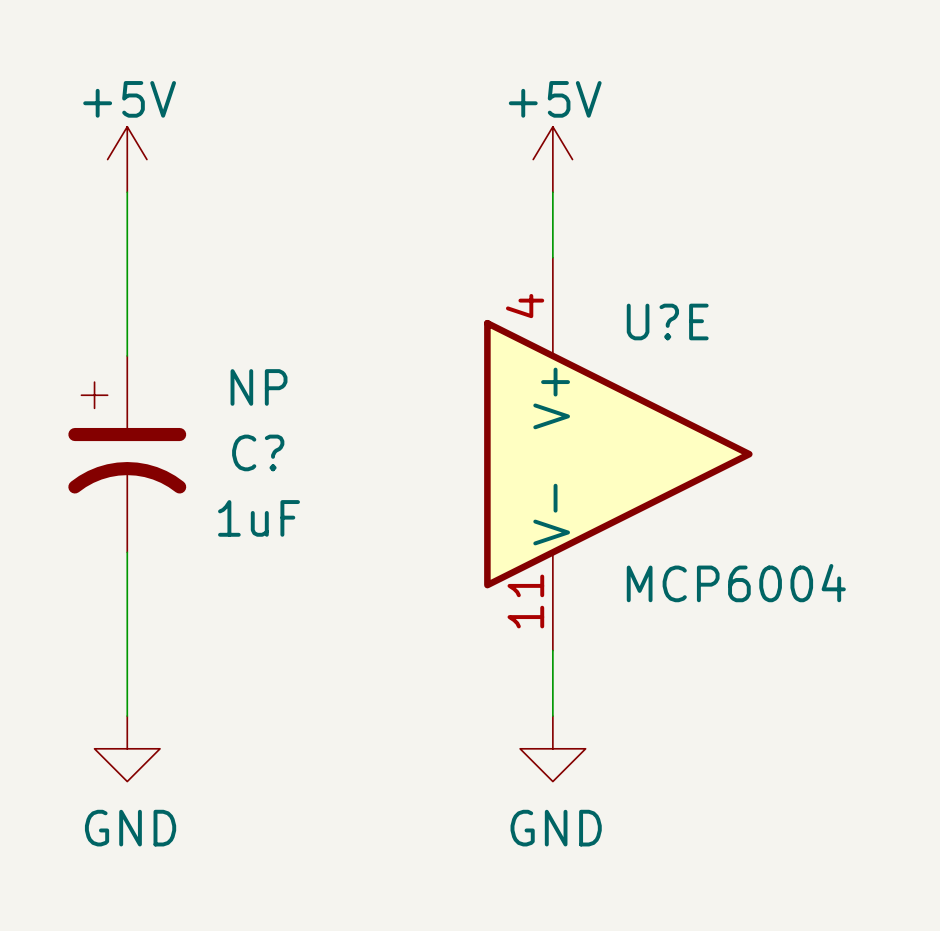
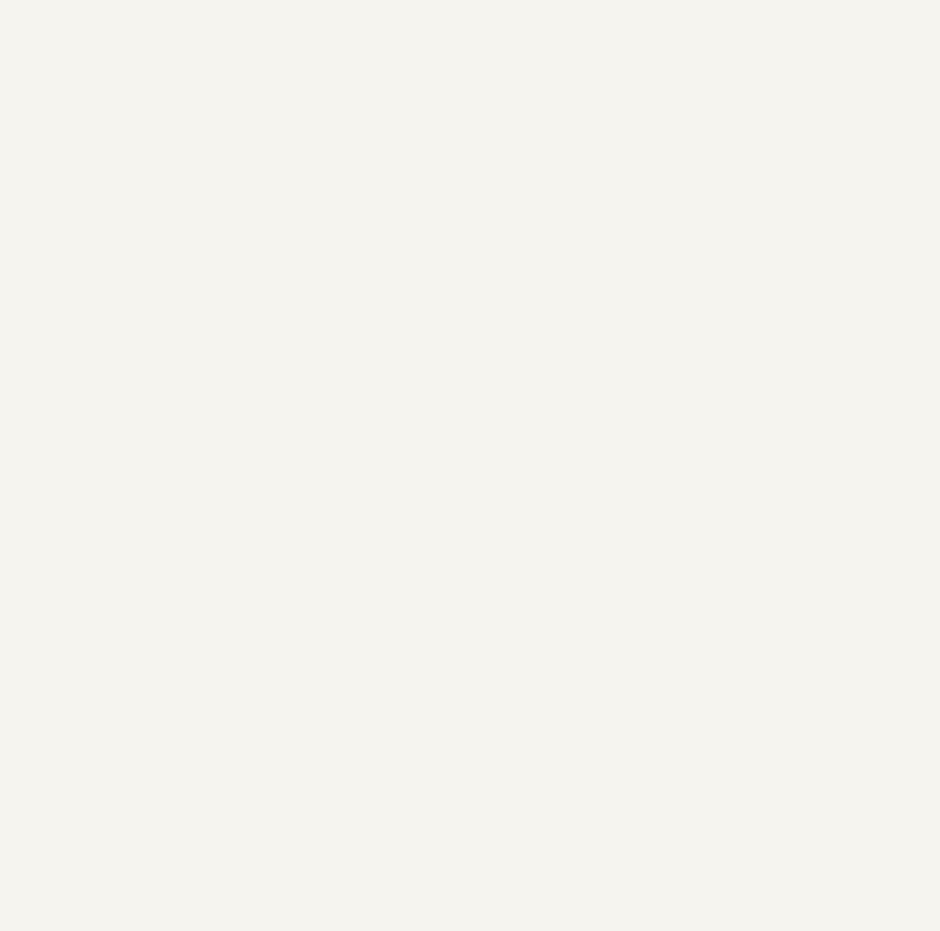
power symbol: +5V (127, 159) -> none
power symbol: +5V (552, 159) -> none
wire: (127, 192) (127, 355) -> none
wire: (552, 192) (552, 257) -> none
C?: 1uF (127, 454) -> none
U?E: MCP6004 (618, 454) -> none
wire: (127, 552) (127, 716) -> none
wire: (552, 650) (552, 716) -> none
power symbol: GND (127, 748) -> none
power symbol: GND (552, 748) -> none

